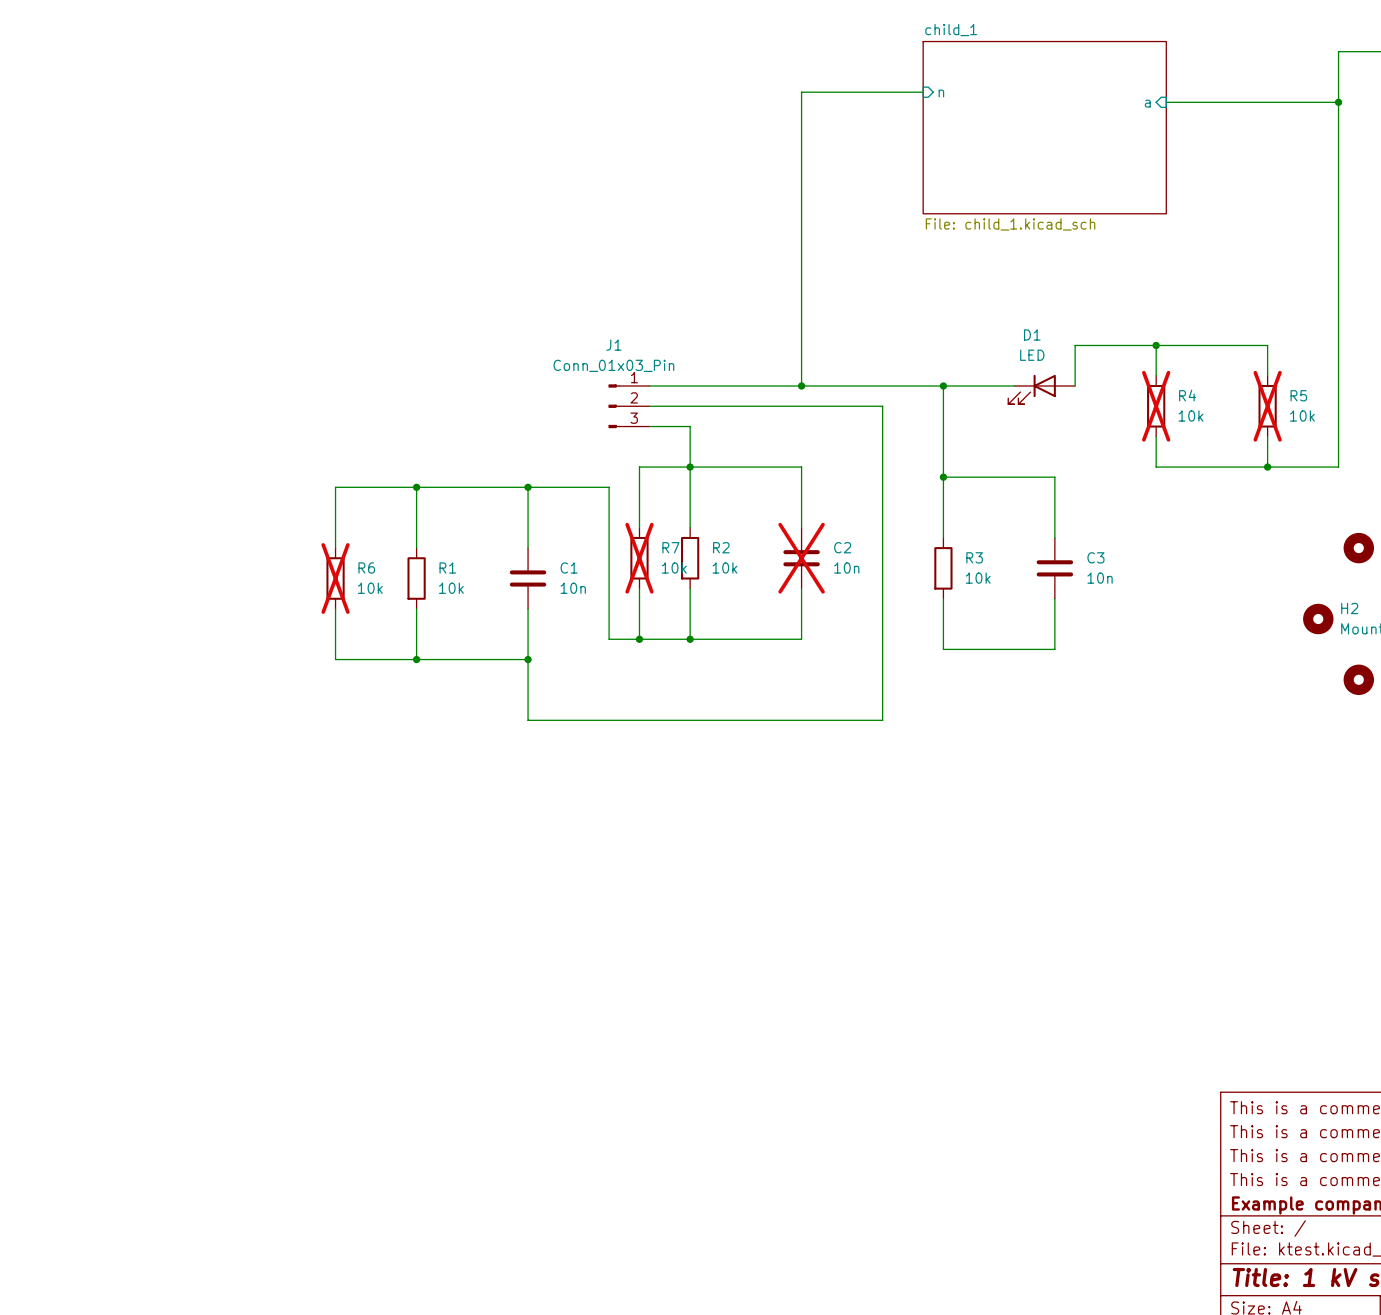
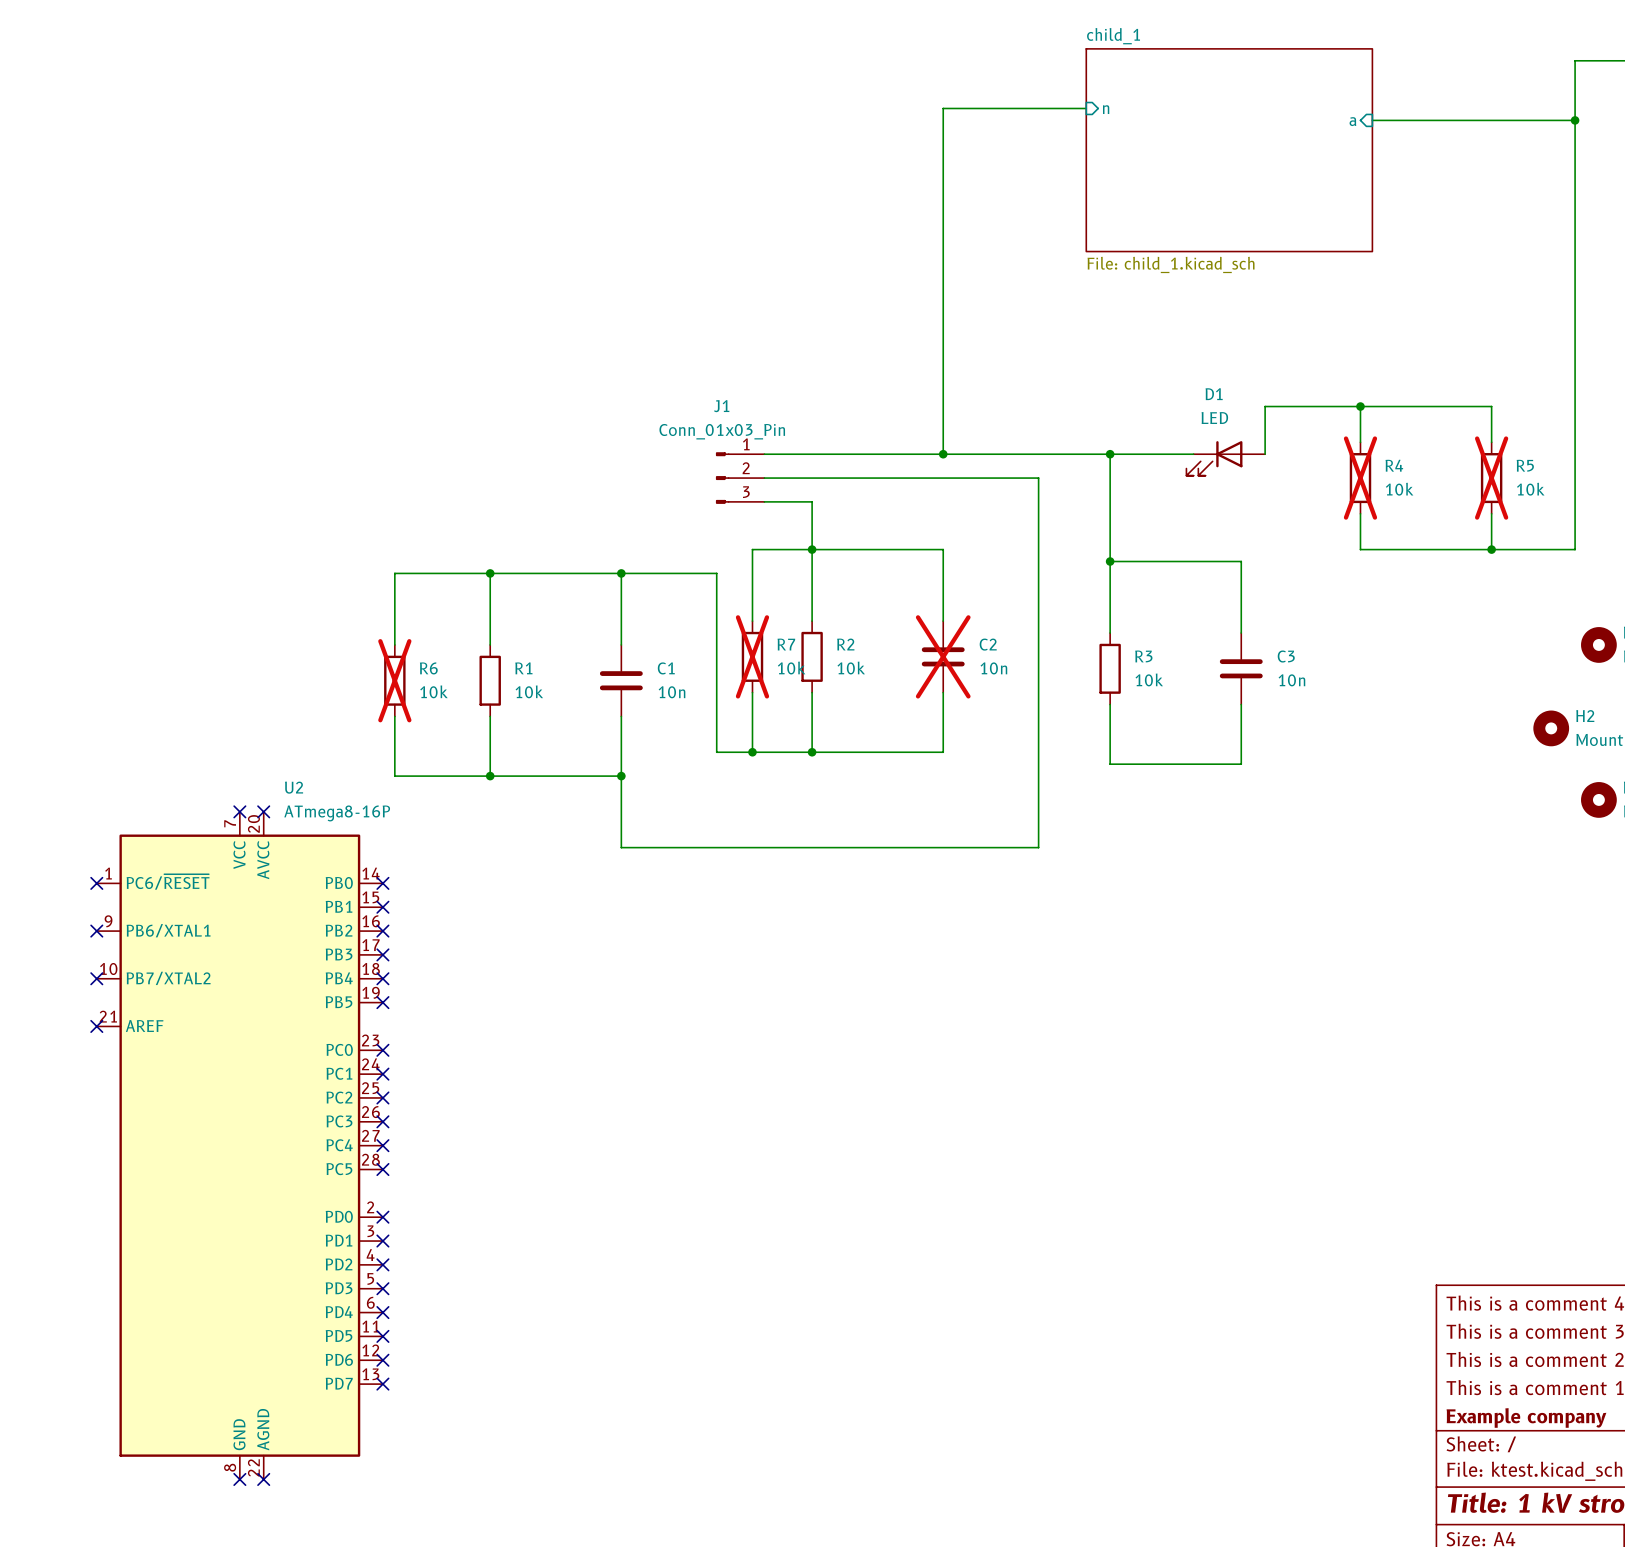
no-connect mark: none -> (239, 811)
no-connect mark: none -> (263, 811)
no-connect mark: none -> (96, 883)
no-connect mark: none -> (382, 883)
no-connect mark: none -> (382, 907)
no-connect mark: none -> (96, 931)
no-connect mark: none -> (382, 931)
no-connect mark: none -> (382, 954)
no-connect mark: none -> (96, 978)
no-connect mark: none -> (382, 978)
no-connect mark: none -> (382, 1002)
no-connect mark: none -> (96, 1026)
no-connect mark: none -> (382, 1050)
no-connect mark: none -> (382, 1074)
no-connect mark: none -> (382, 1097)
no-connect mark: none -> (382, 1121)
U2: none -> ATmega8-16P (239, 1145)
no-connect mark: none -> (382, 1145)
no-connect mark: none -> (382, 1169)
no-connect mark: none -> (382, 1217)
no-connect mark: none -> (382, 1241)
no-connect mark: none -> (382, 1264)
no-connect mark: none -> (382, 1288)
no-connect mark: none -> (382, 1312)
no-connect mark: none -> (382, 1336)
no-connect mark: none -> (382, 1360)
no-connect mark: none -> (382, 1384)
no-connect mark: none -> (239, 1479)
no-connect mark: none -> (263, 1479)

